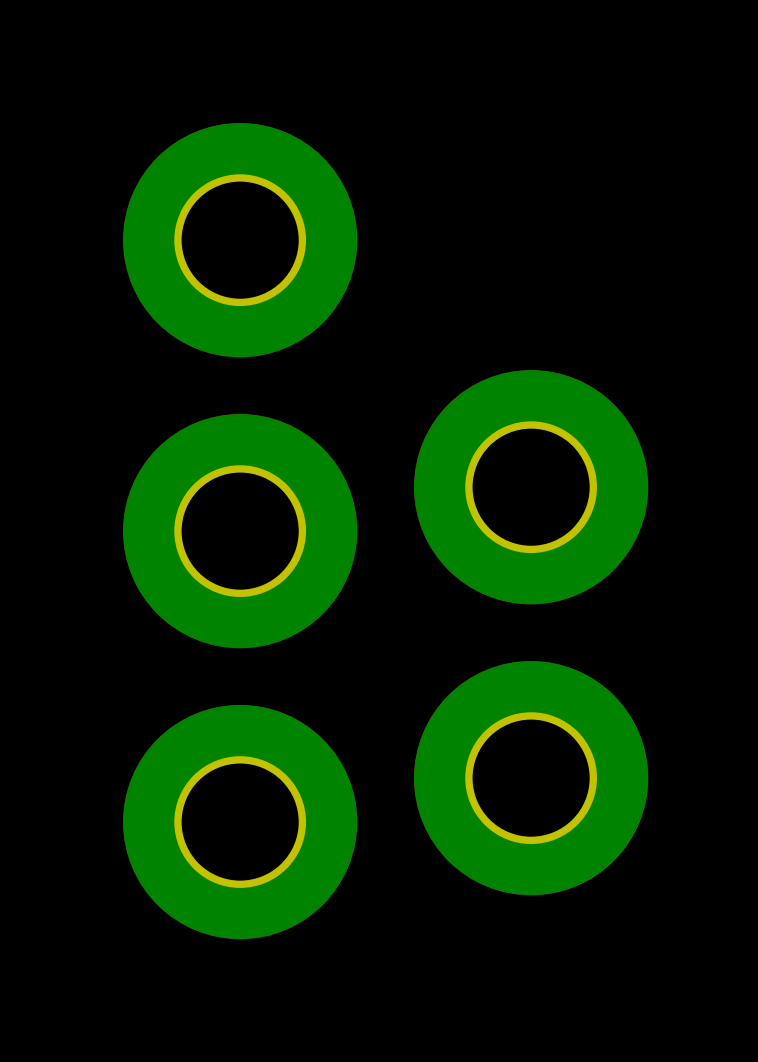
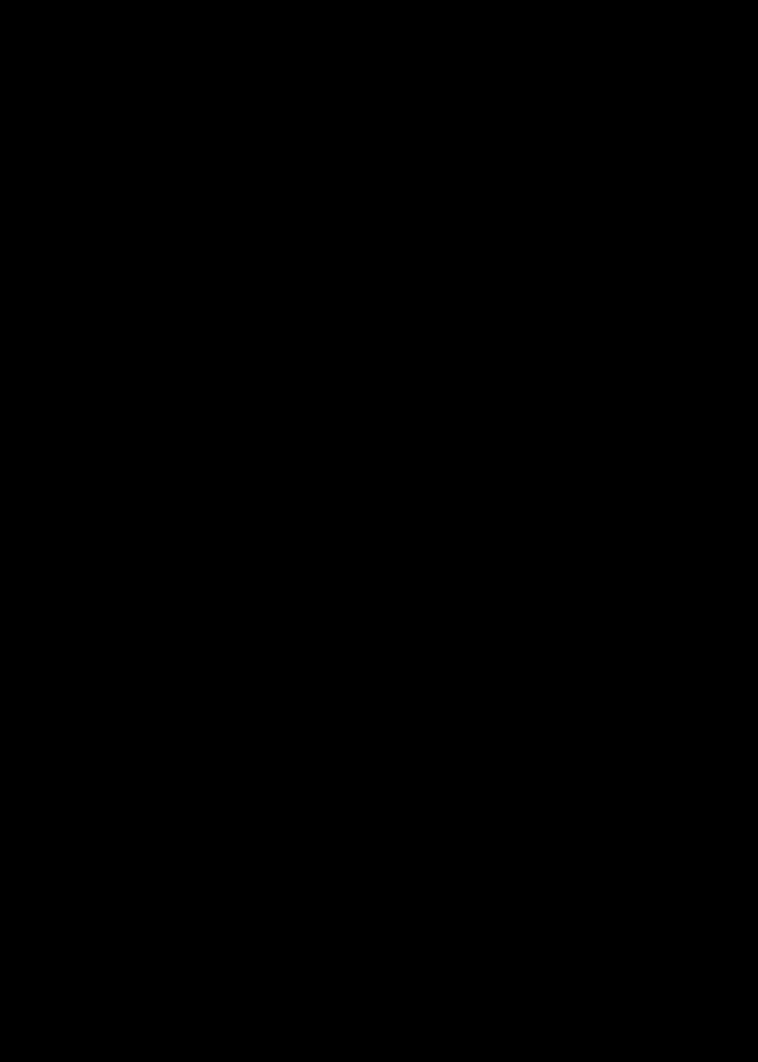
part: (240, 240) -> none
part: (531, 487) -> none
part: (240, 531) -> none
part: (531, 778) -> none
part: (240, 822) -> none

